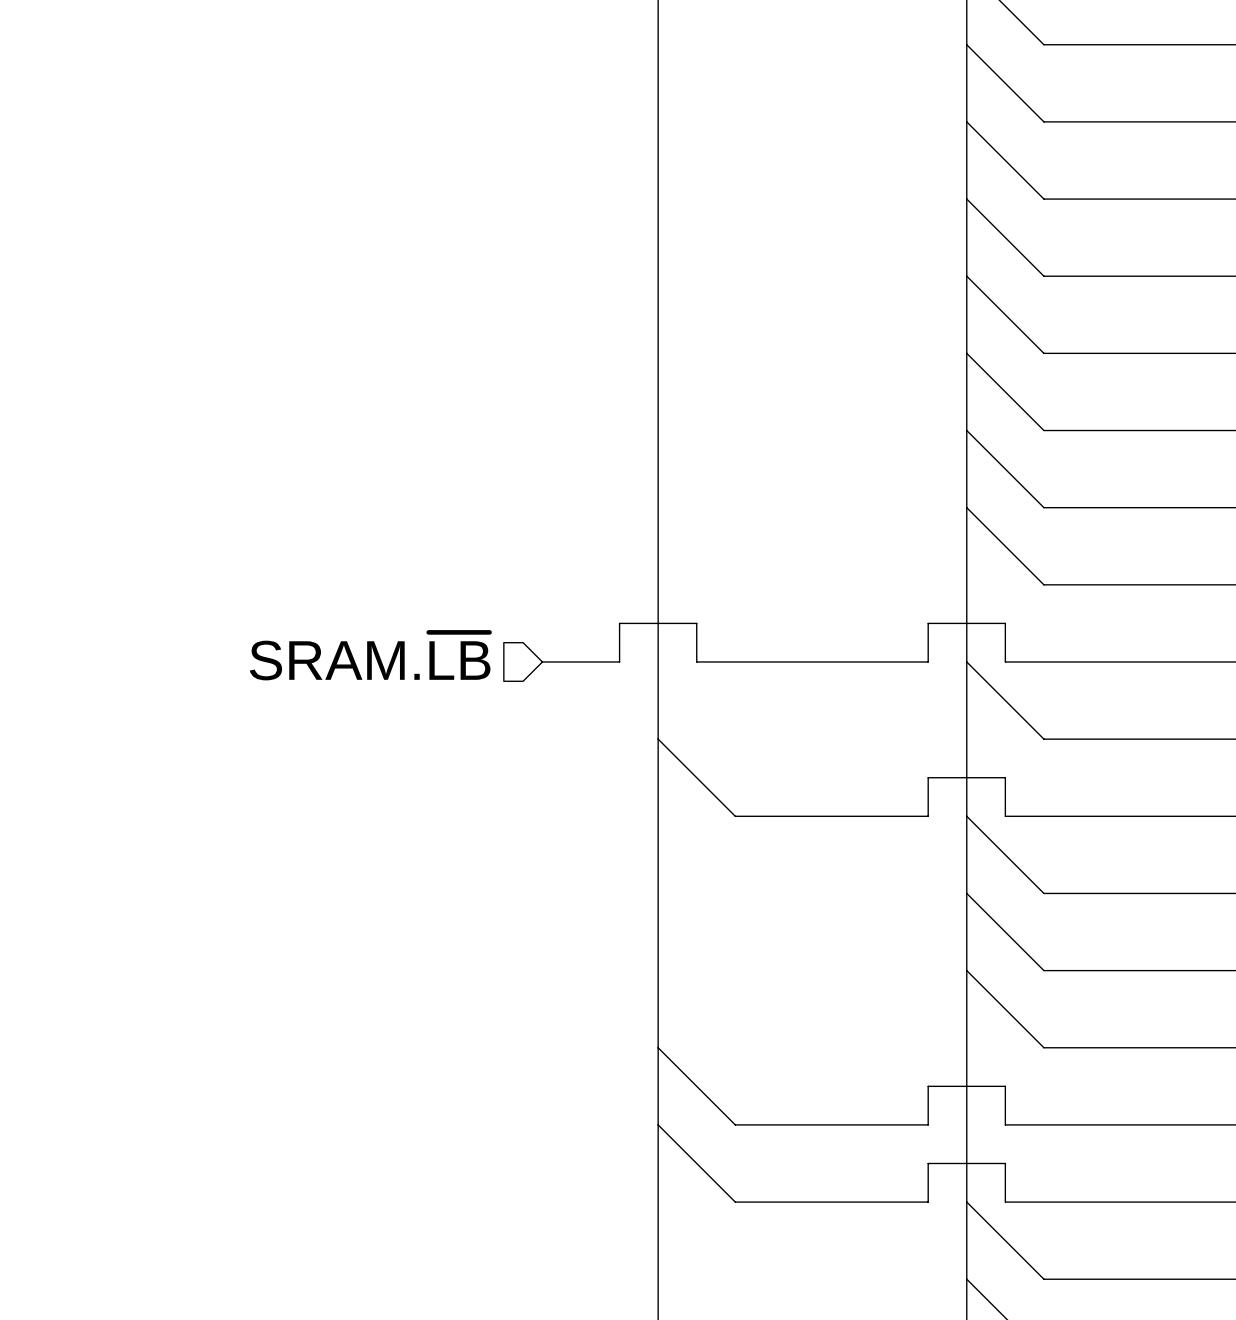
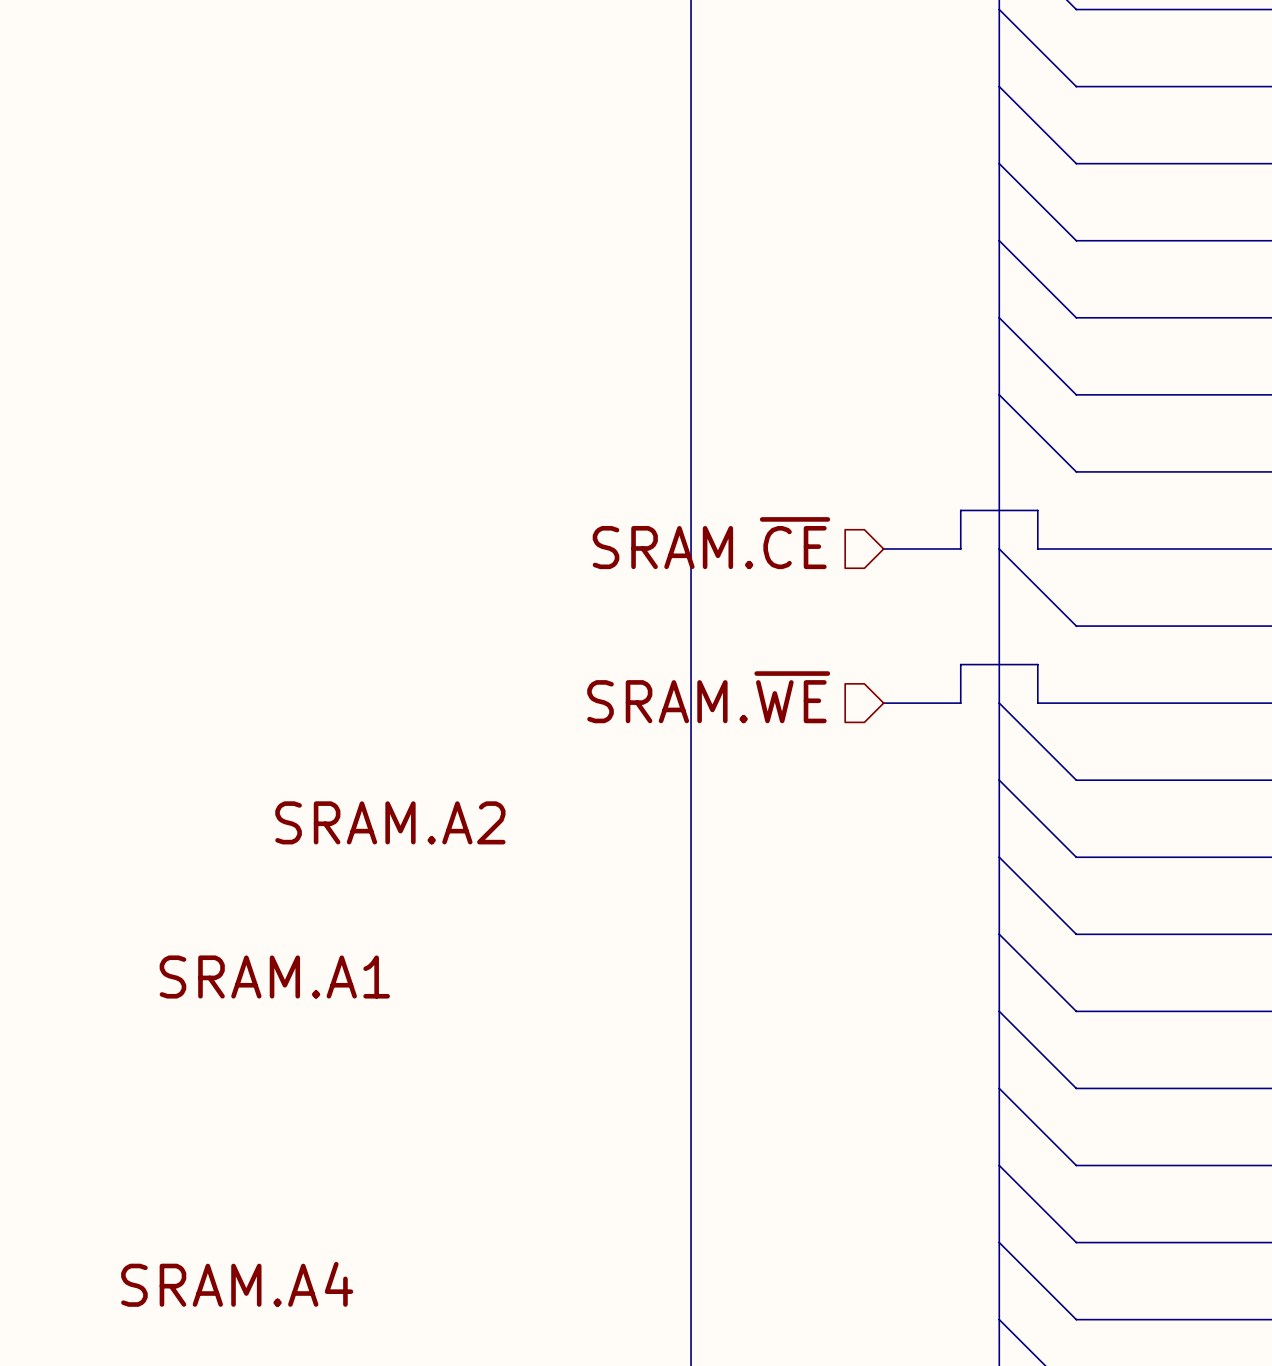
wire: (966, 430) (1043, 507) -> (883, 548) (960, 548) (960, 510) (1037, 510) (1037, 548) (1076, 548)
hierarchical label: none -> SRAM.~{CE} (711, 543)
hierarchical label: SRAM.~{LB} (370, 656) -> SRAM.~{WE} (708, 697)
wire: (542, 661) (619, 661) (619, 623) (696, 623) (696, 661) (851, 661) -> none
wire: (658, 739) (735, 816) (928, 816) (928, 777) (1005, 777) (1005, 816) (1043, 816) -> (999, 780) (1076, 857)
label: none -> SRAM.A2 (390, 822)
label: none -> SRAM.A1 (274, 976)
wire: (658, 1047) (735, 1124) (928, 1124) (928, 1086) (1005, 1086) (1005, 1124) (1043, 1124) -> (999, 1088) (1076, 1165)
wire: (658, 1124) (735, 1202) (928, 1202) (928, 1163) (1005, 1163) (1005, 1202) (1043, 1202) -> (999, 1165) (1076, 1242)
label: none -> SRAM.A4 (237, 1284)

